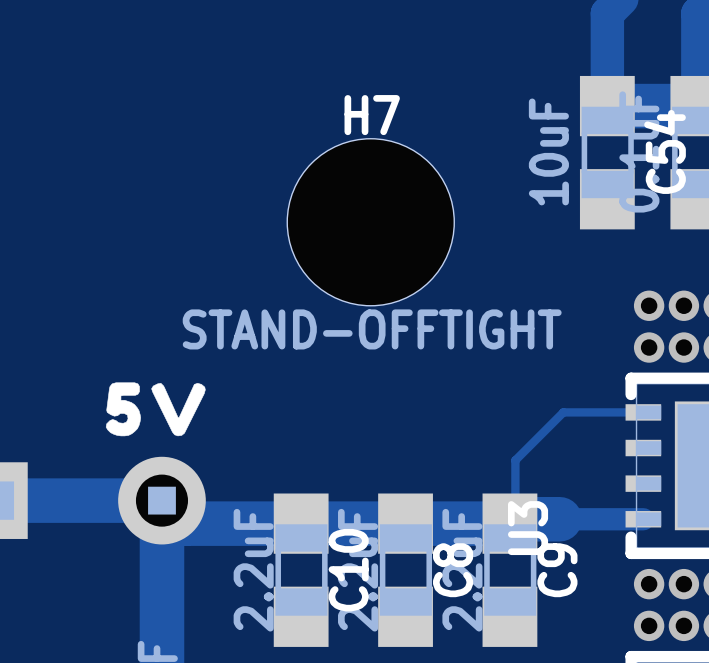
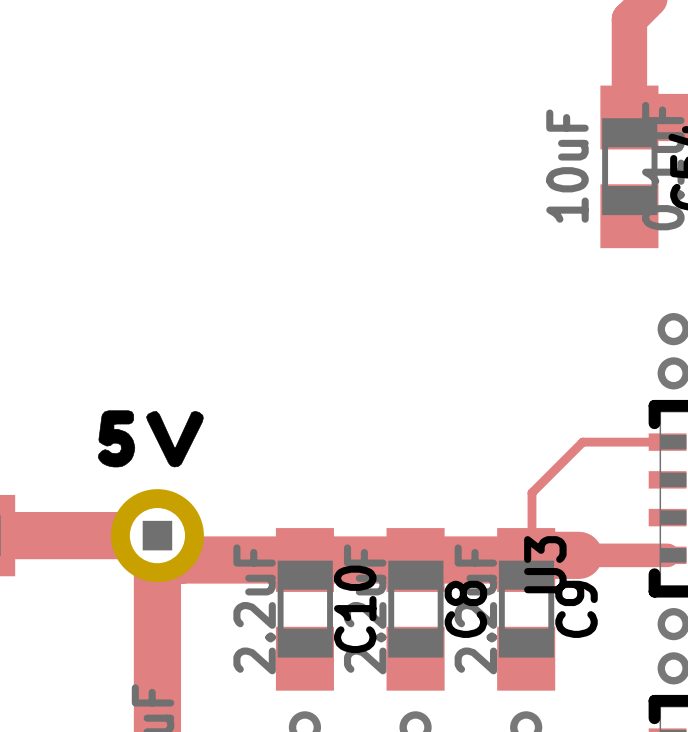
H7: STAND-OFFTIGHT (370, 222) -> none

